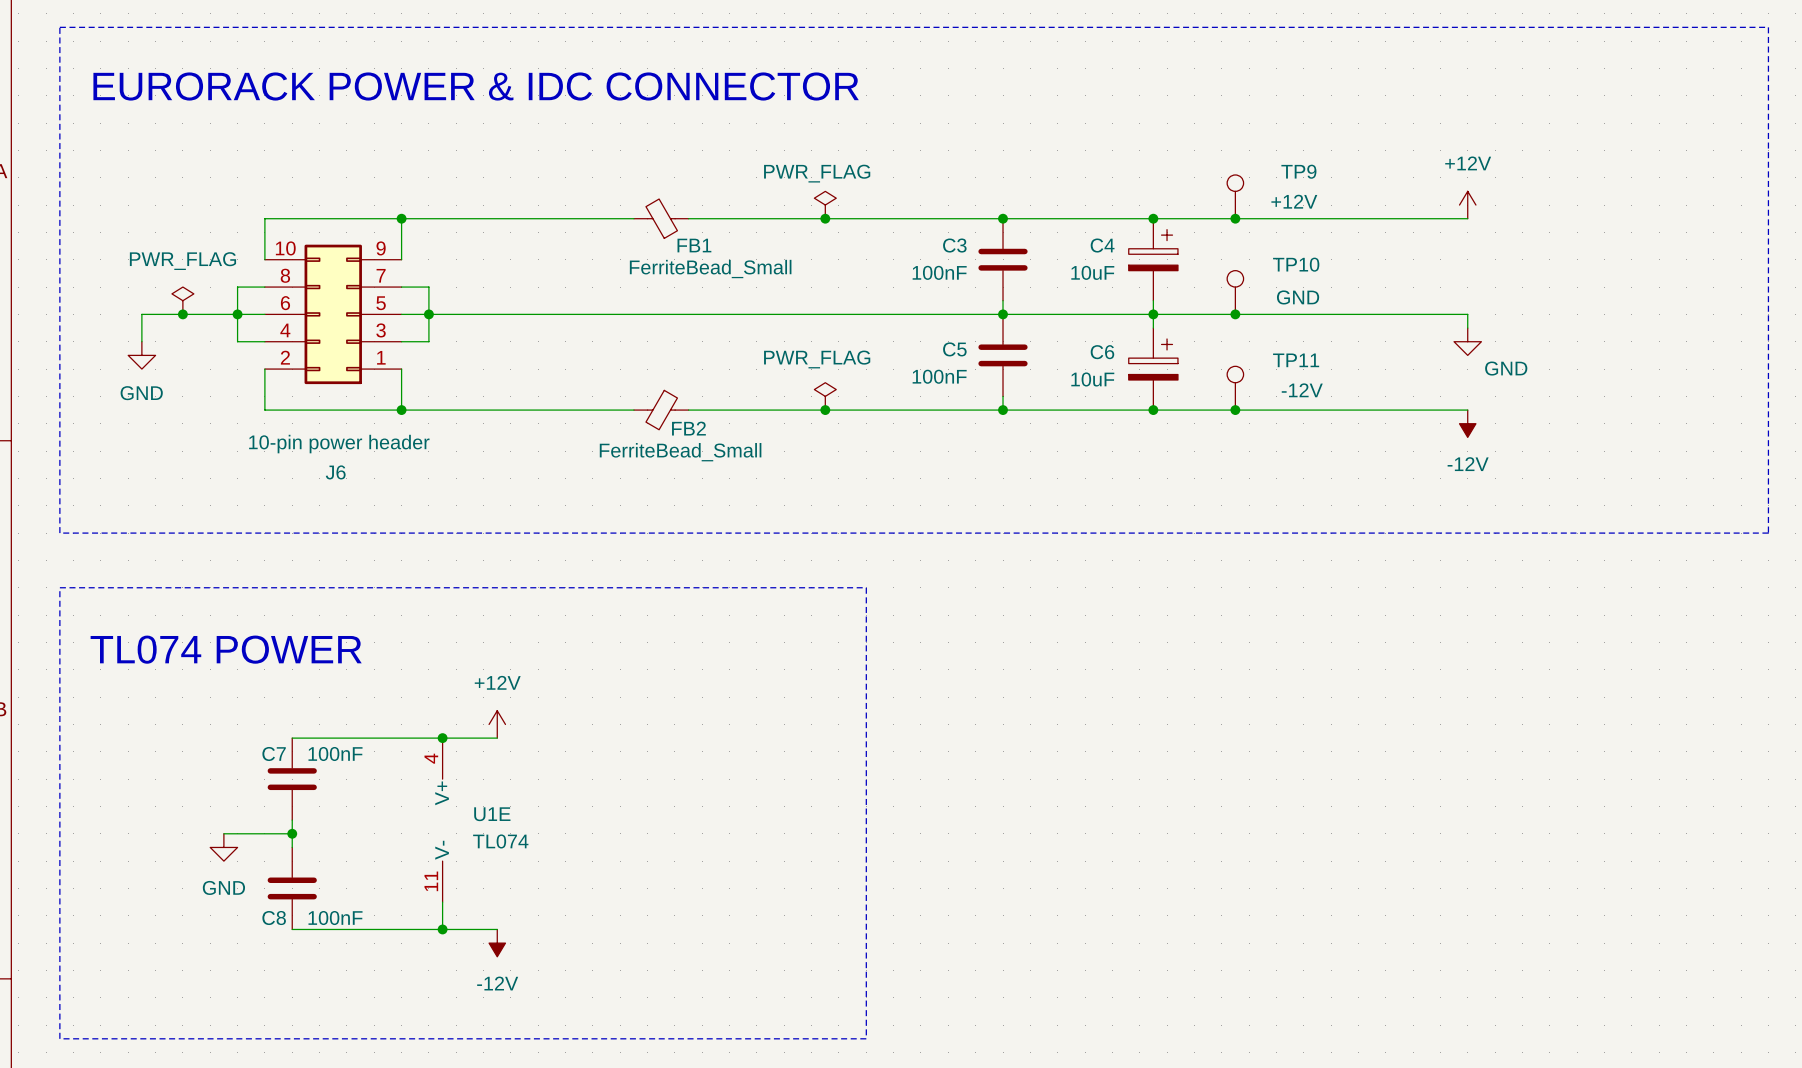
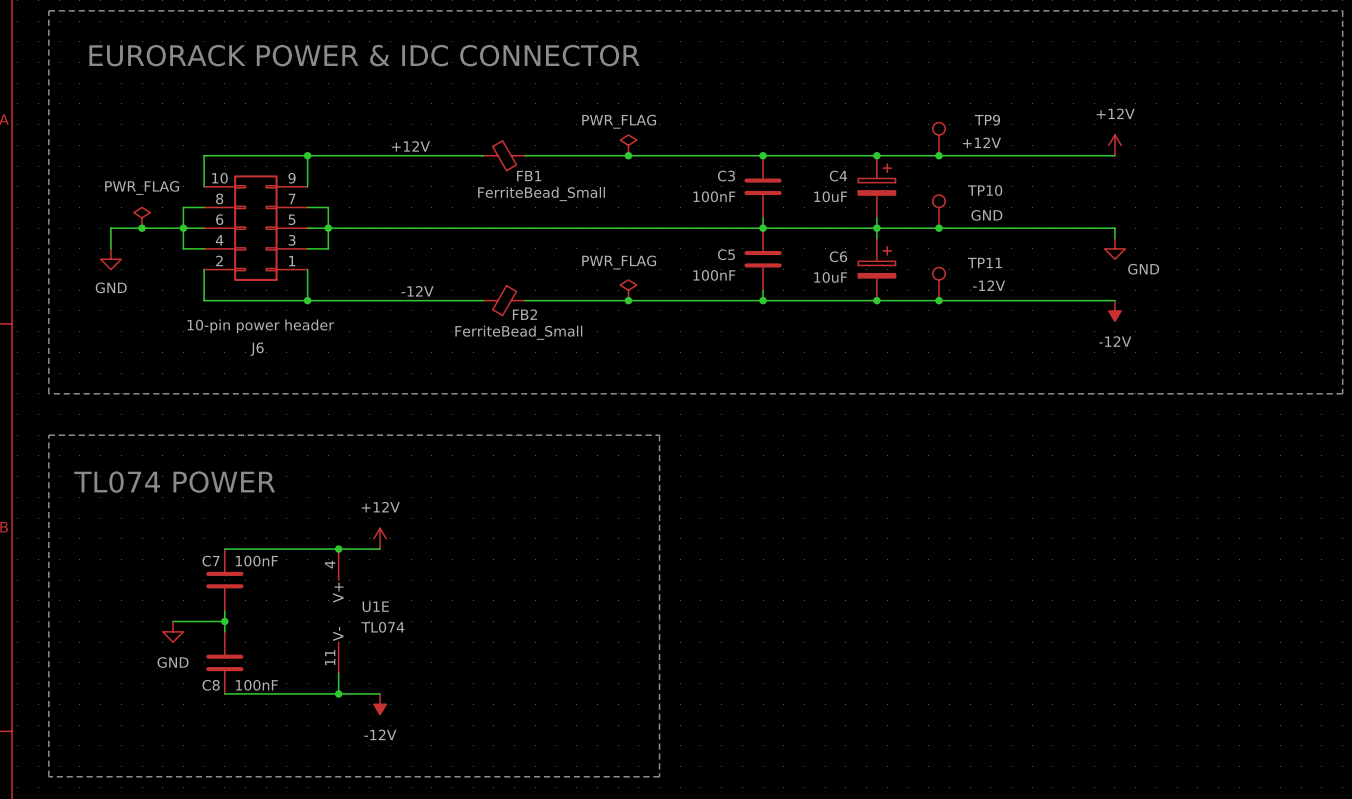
label: none -> +12V (410, 146)
label: none -> -12V (417, 291)

